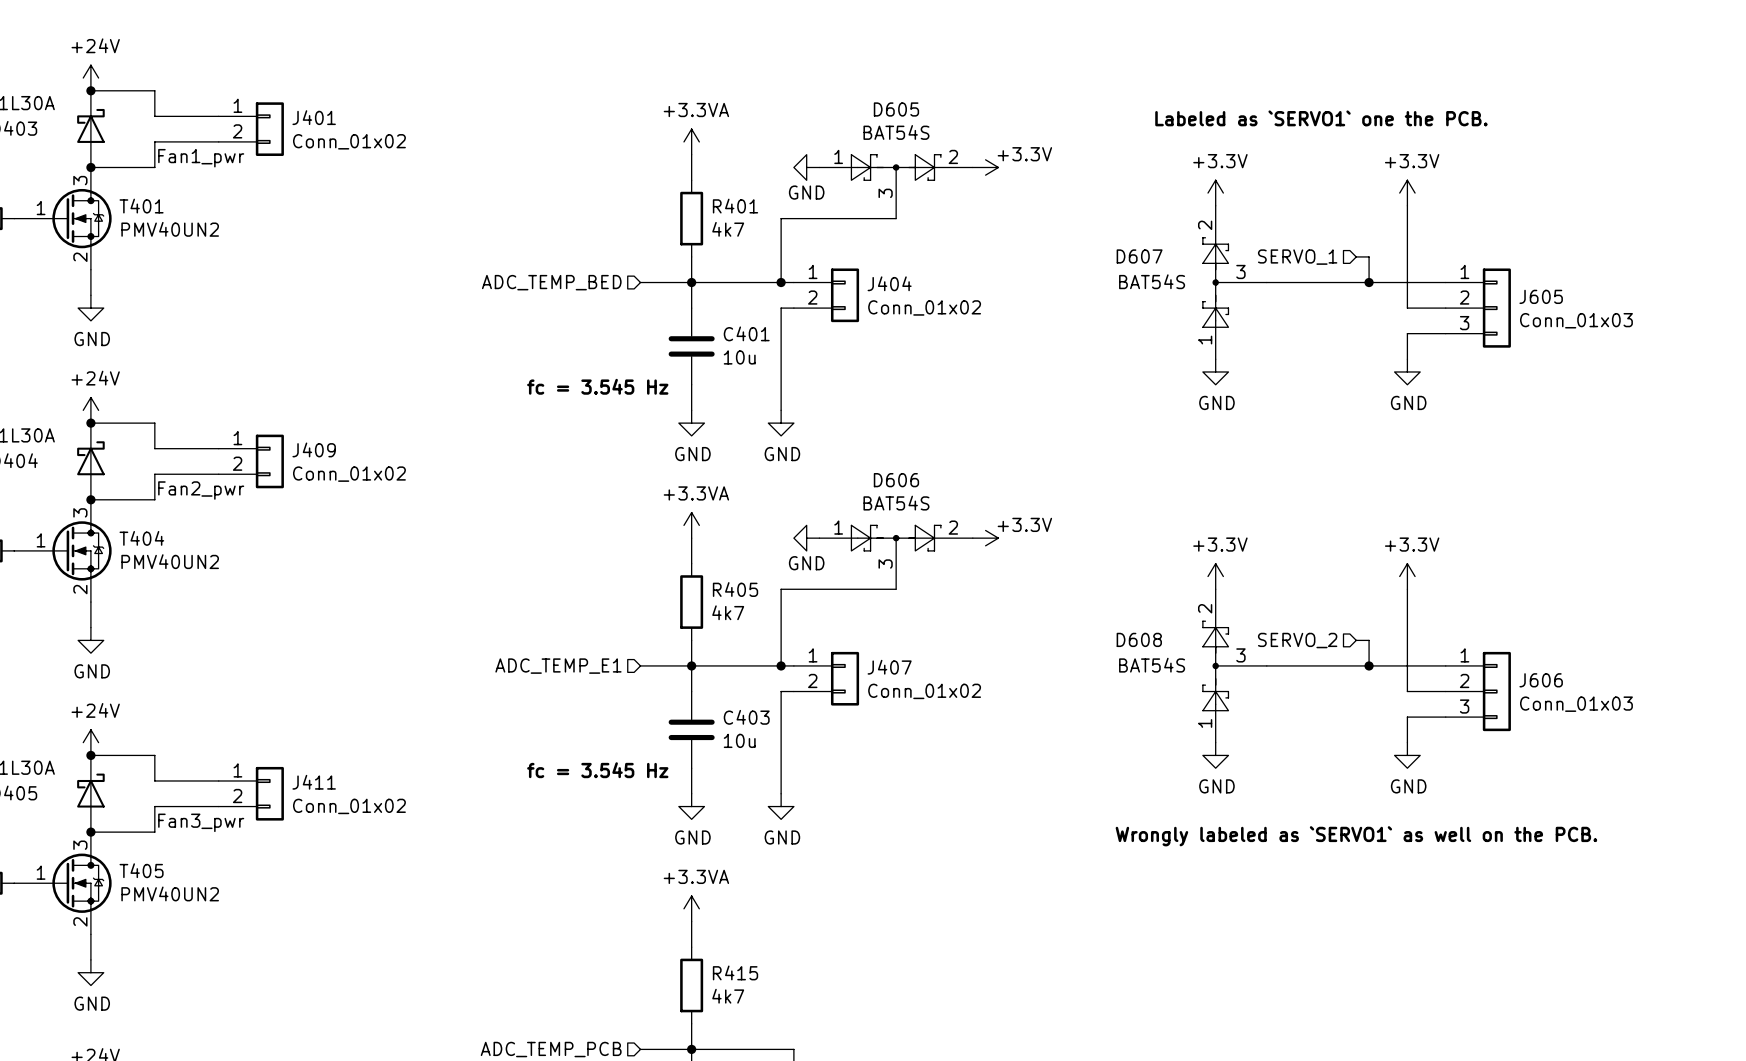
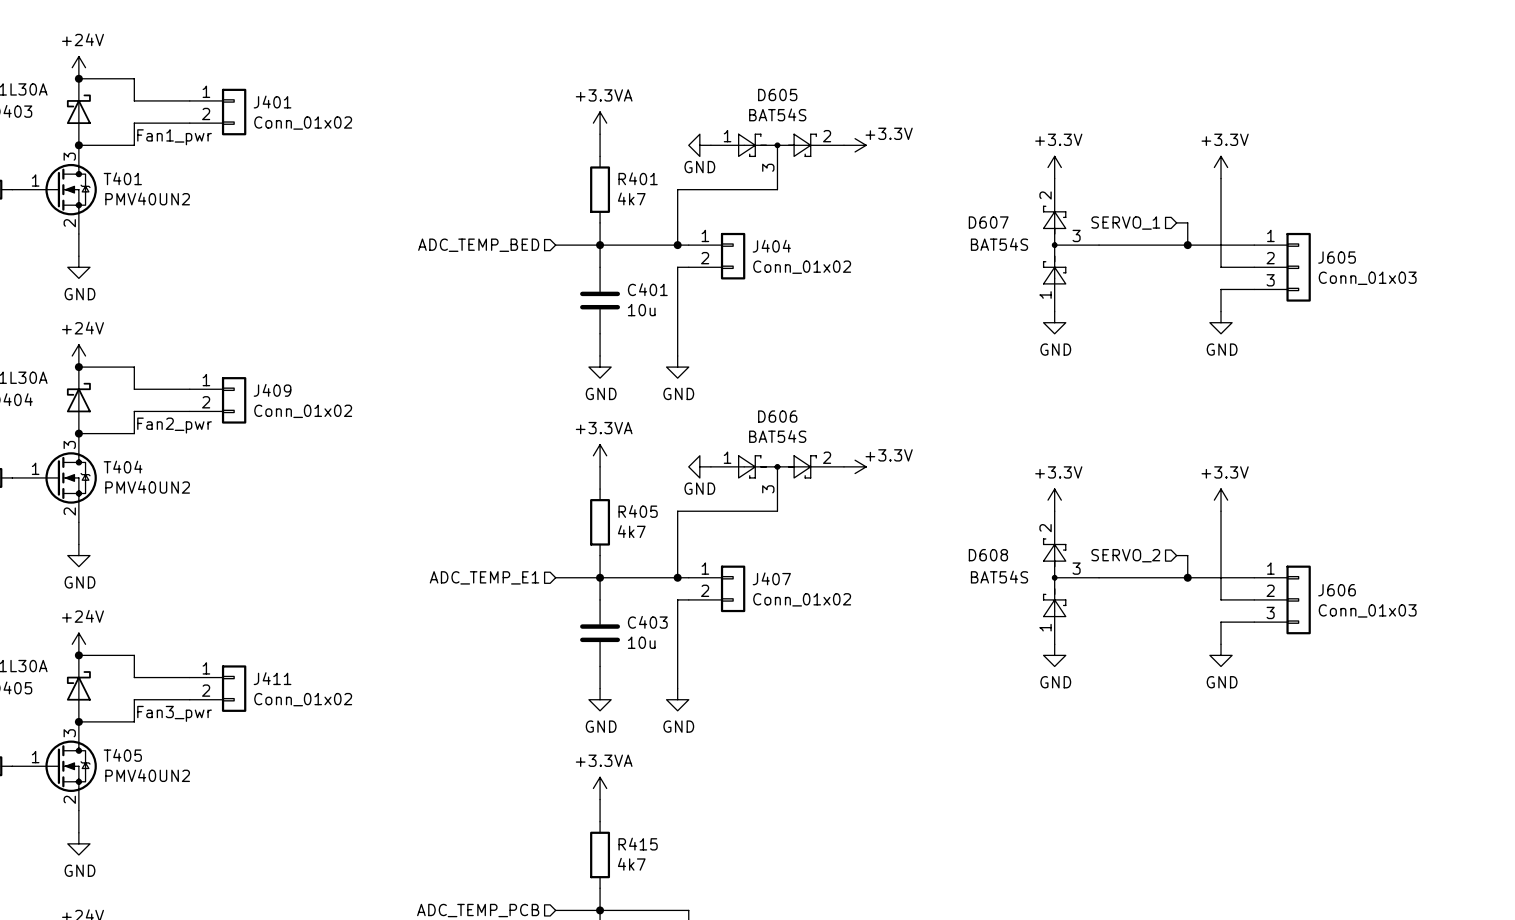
text: Labeled as `SERVO1` one the PCB. (1321, 118) -> none
text: fc = 3.545 Hz (597, 386) -> none
text: fc = 3.545 Hz (597, 770) -> none
text: Wrongly labeled as `SERVO1` as well on the PCB. (1356, 836) -> none

